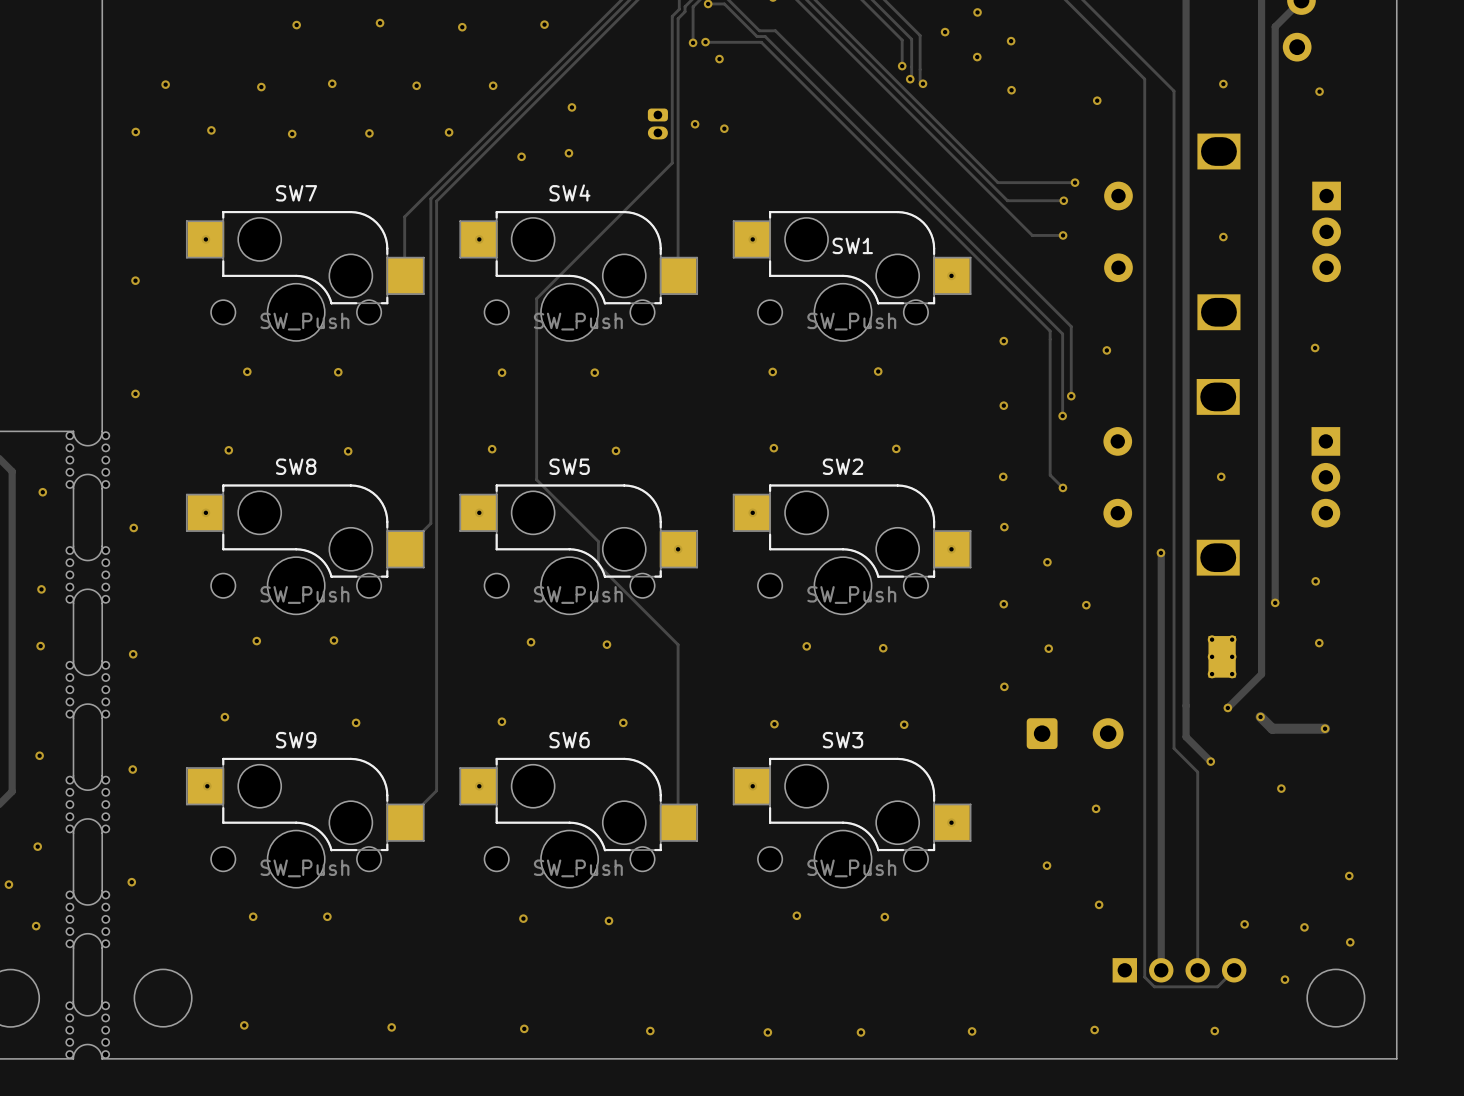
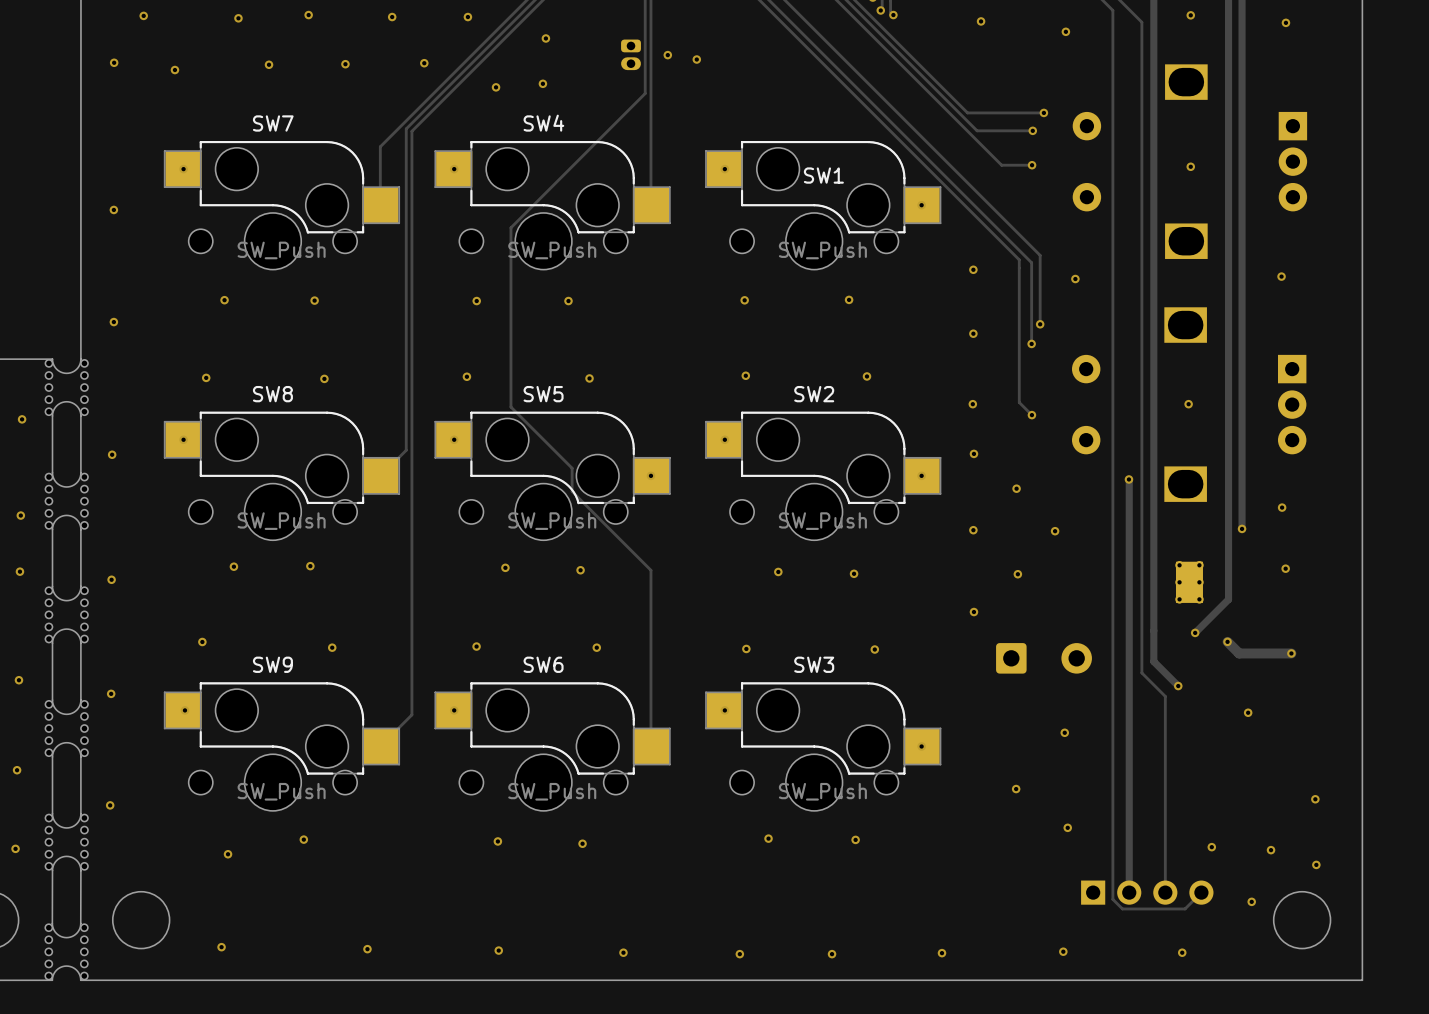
via position: (211, 130) -> (174, 70)
via position: (253, 916) -> (228, 854)

